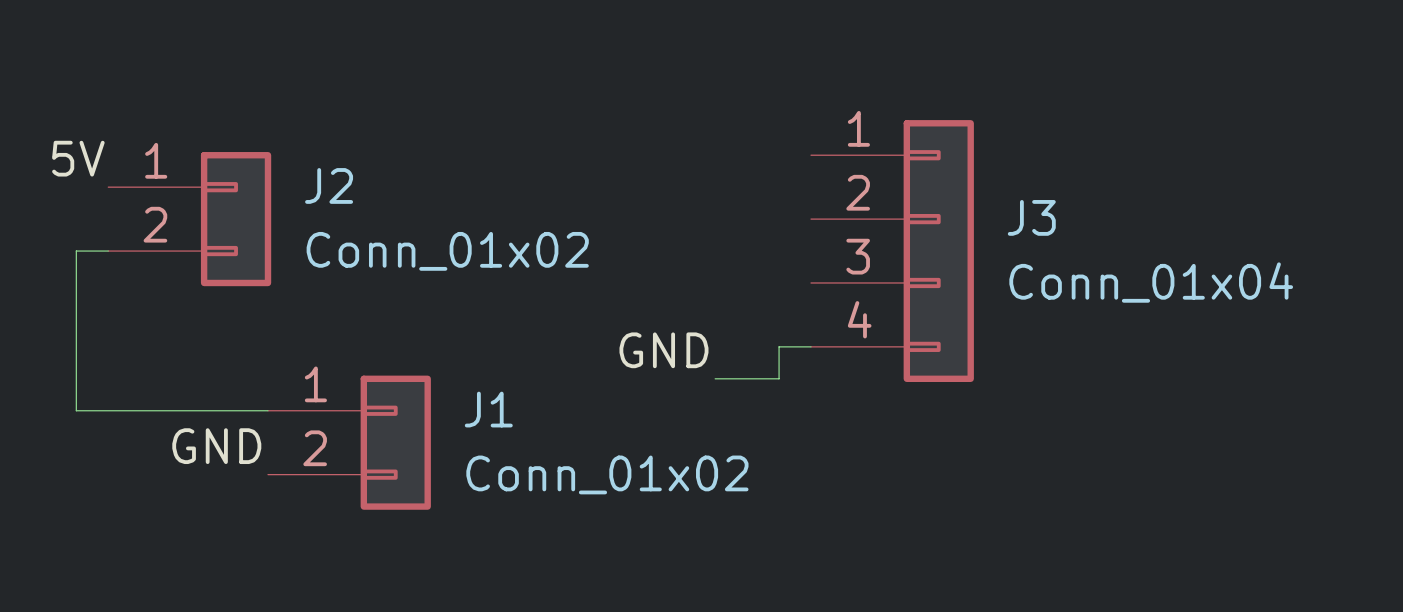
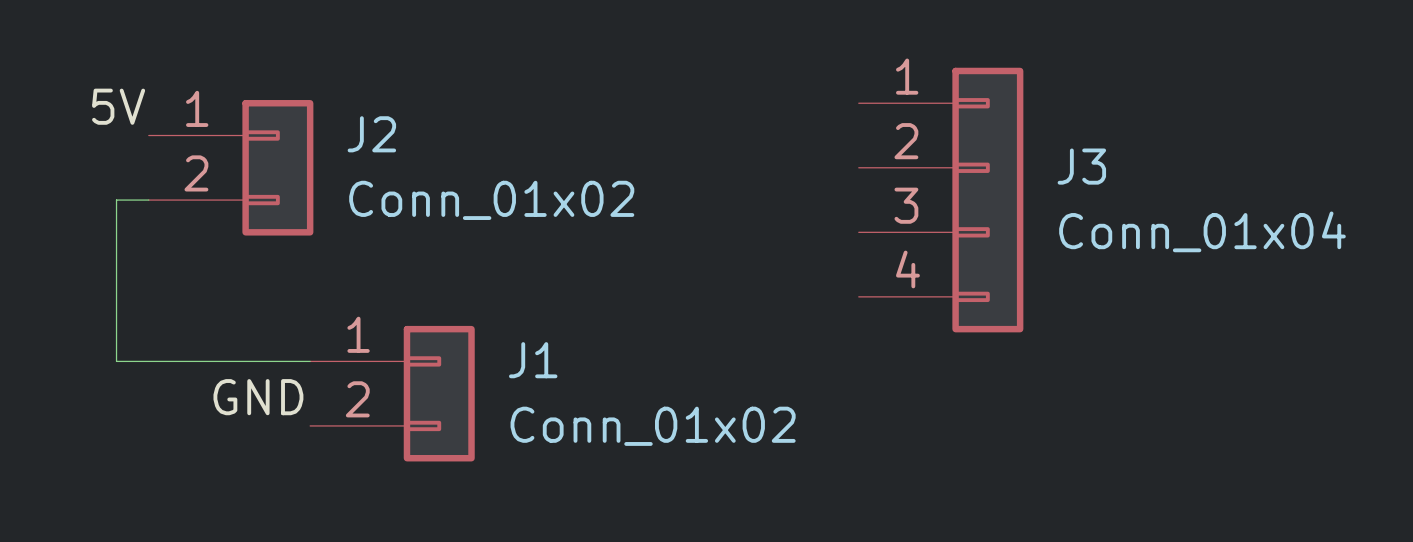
wire: (811, 346) (779, 346) (779, 378) (715, 378) -> none
label: GND (663, 350) -> none

